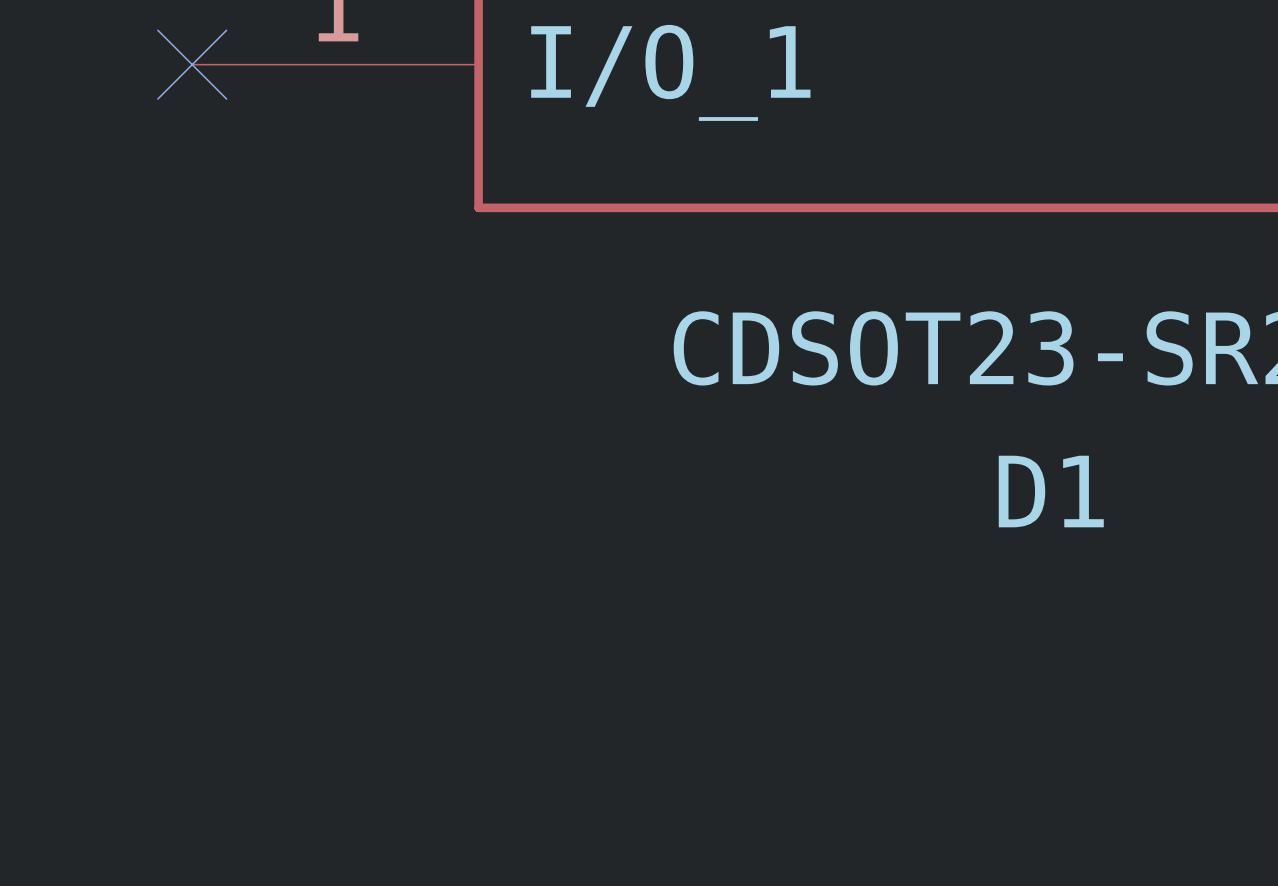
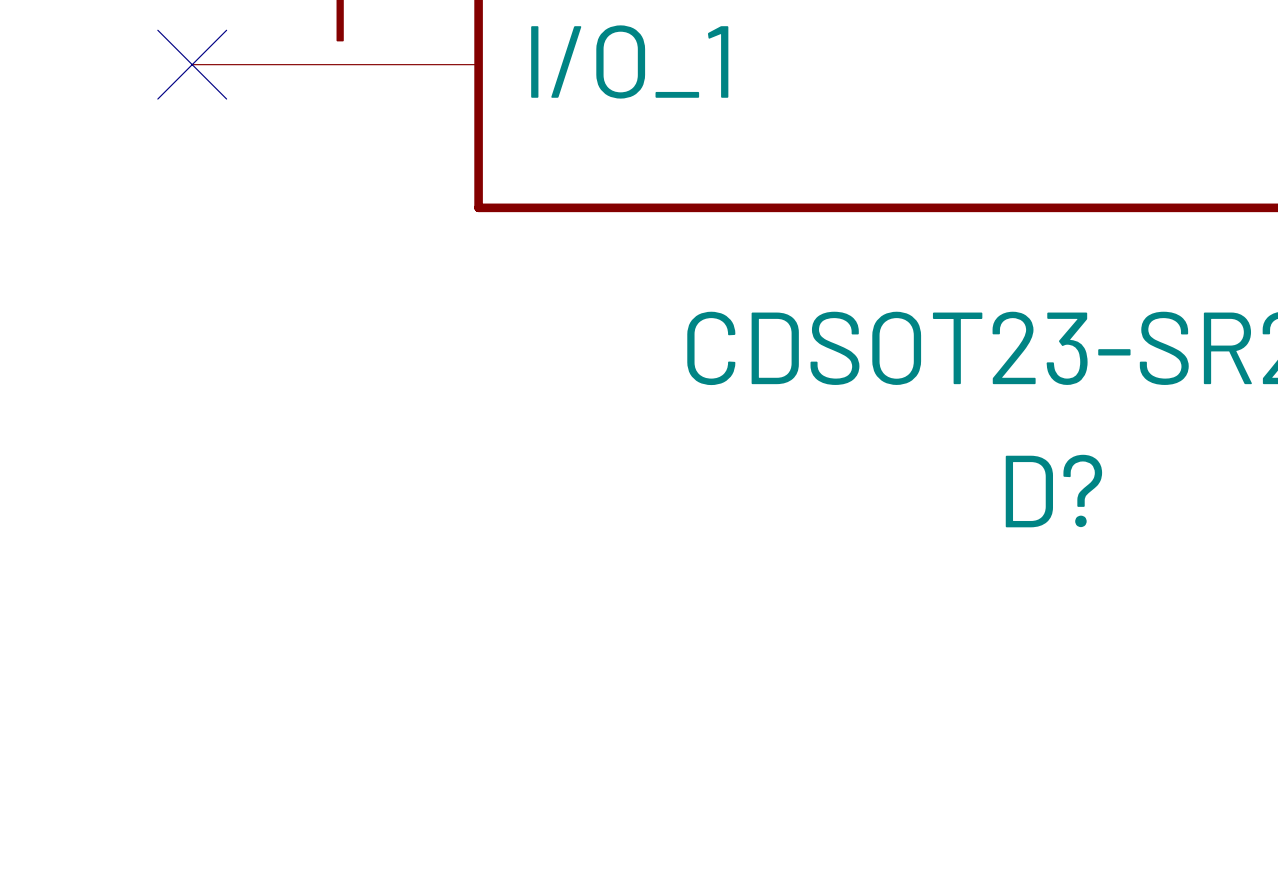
D1 name: D1 (1051, 491) -> D? (1053, 491)

